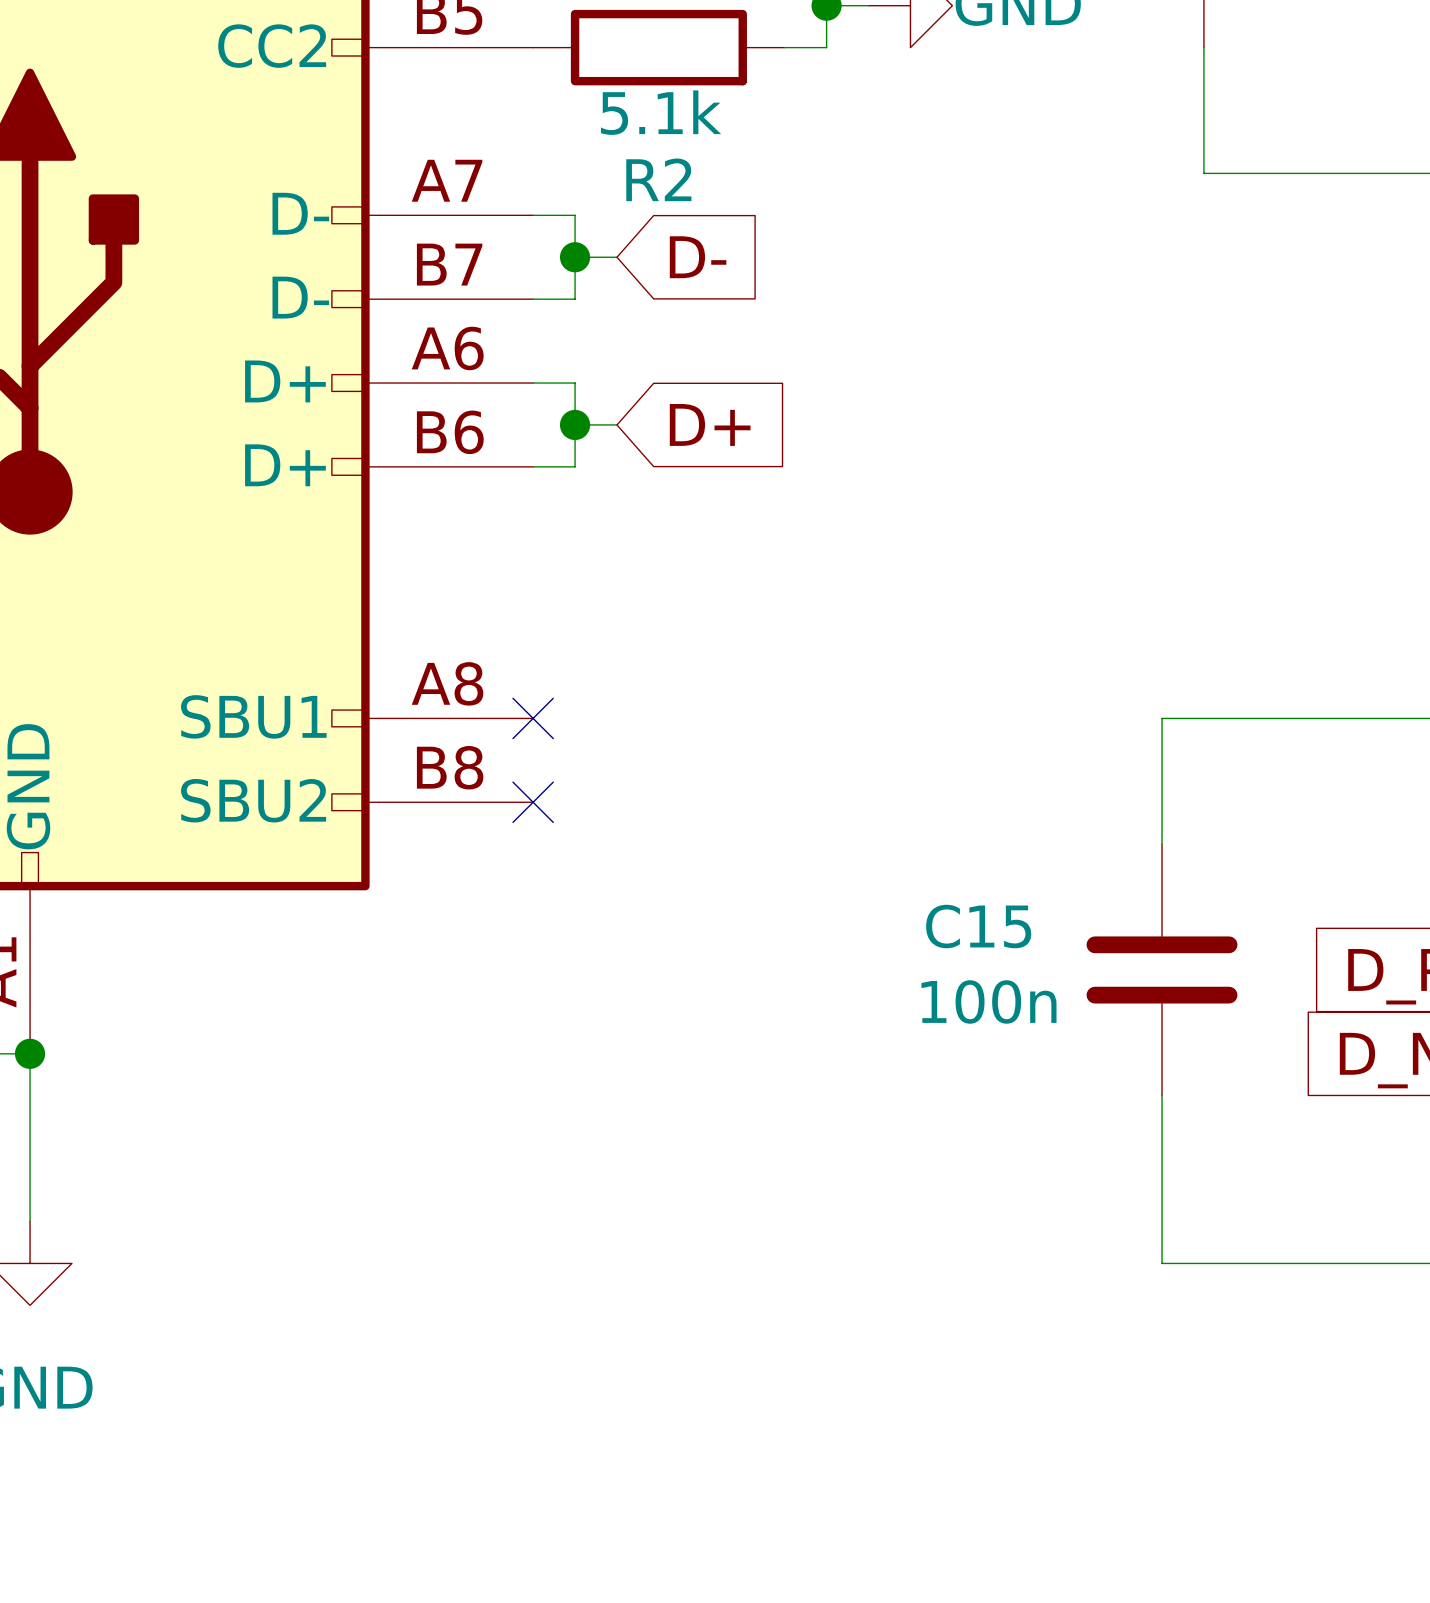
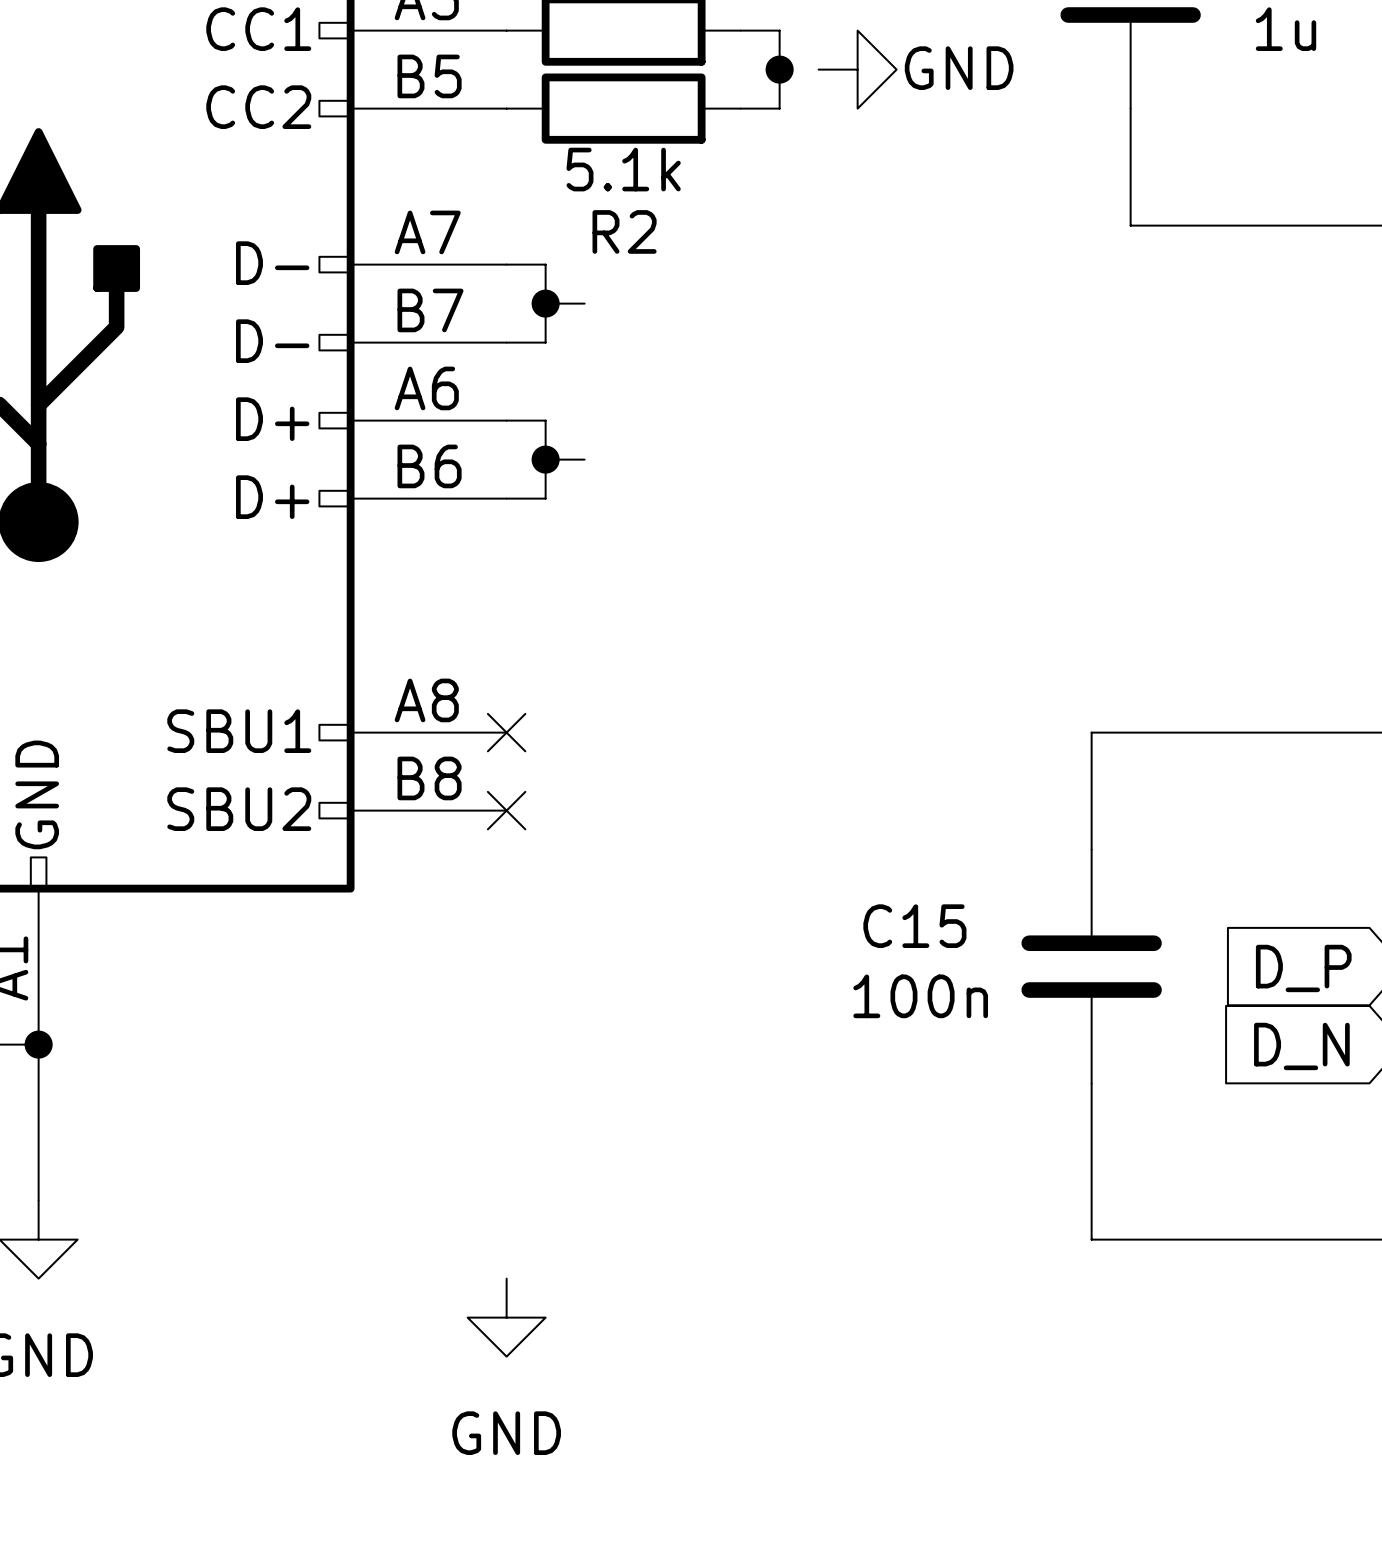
wire: (826, 5) (868, 5) -> none
global label: D- (698, 257) -> none
global label: D+ (710, 424) -> none
power symbol: none -> GND (506, 1317)

